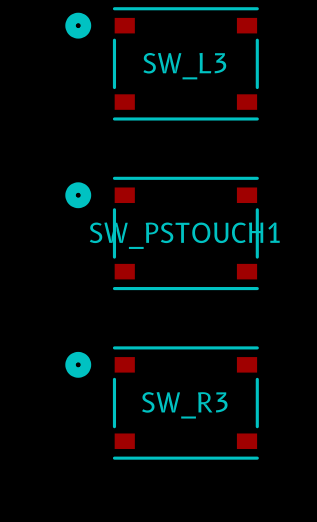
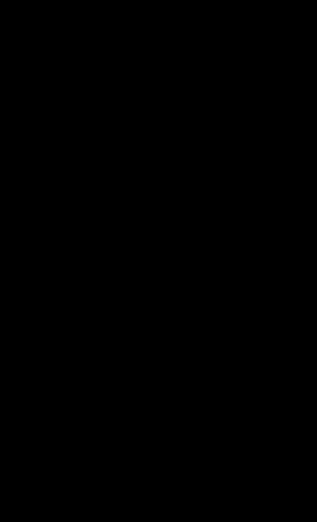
SW_L3: (162, 63) -> none
SW_PSTOUCH1: (162, 233) -> none
SW_R3: (162, 403) -> none

